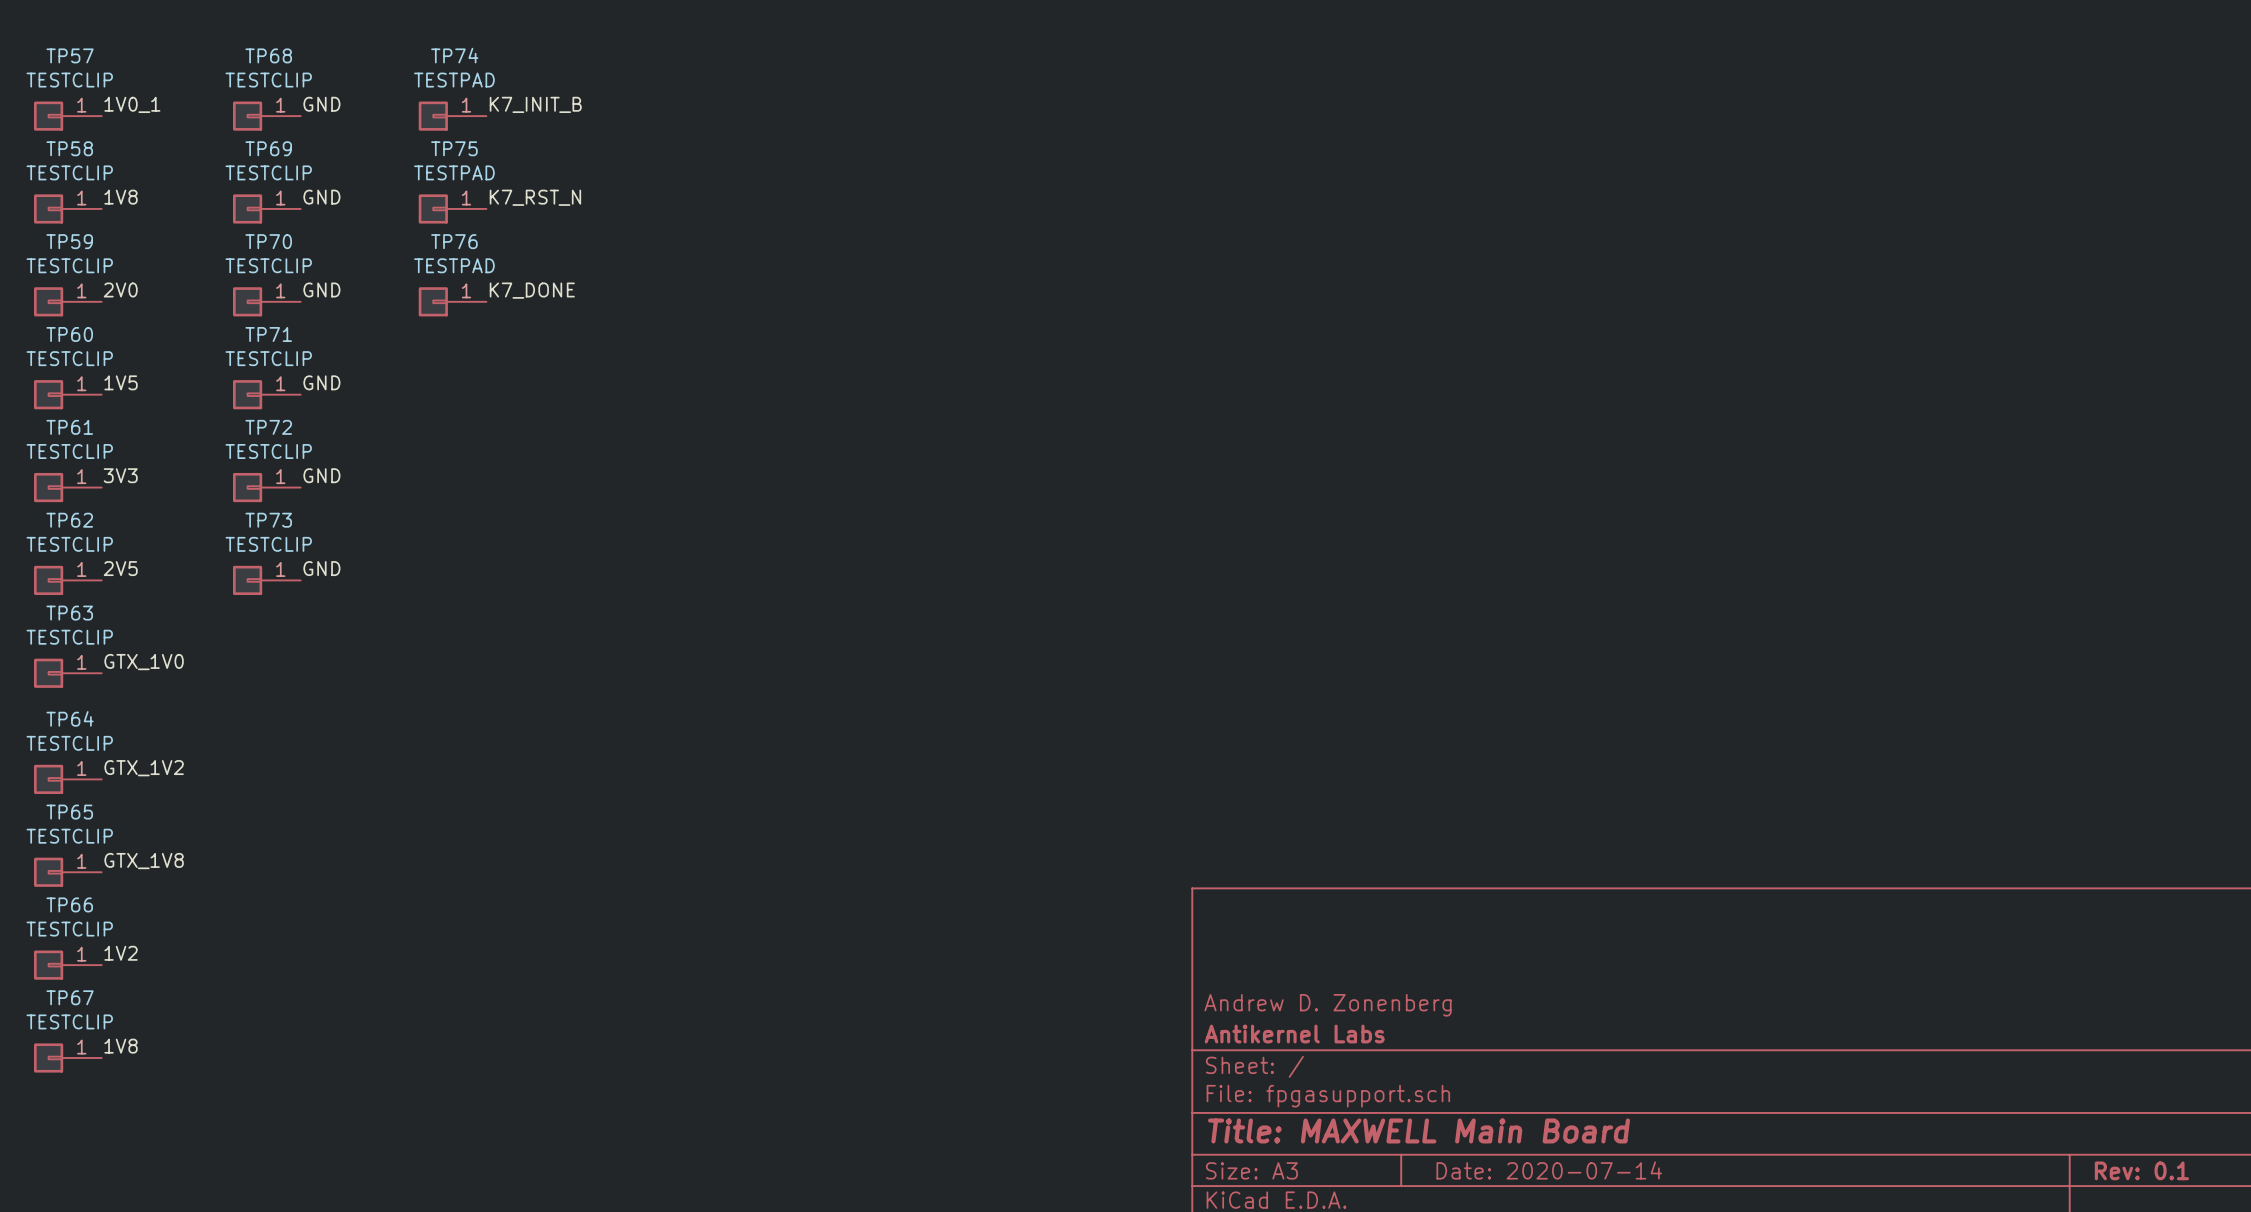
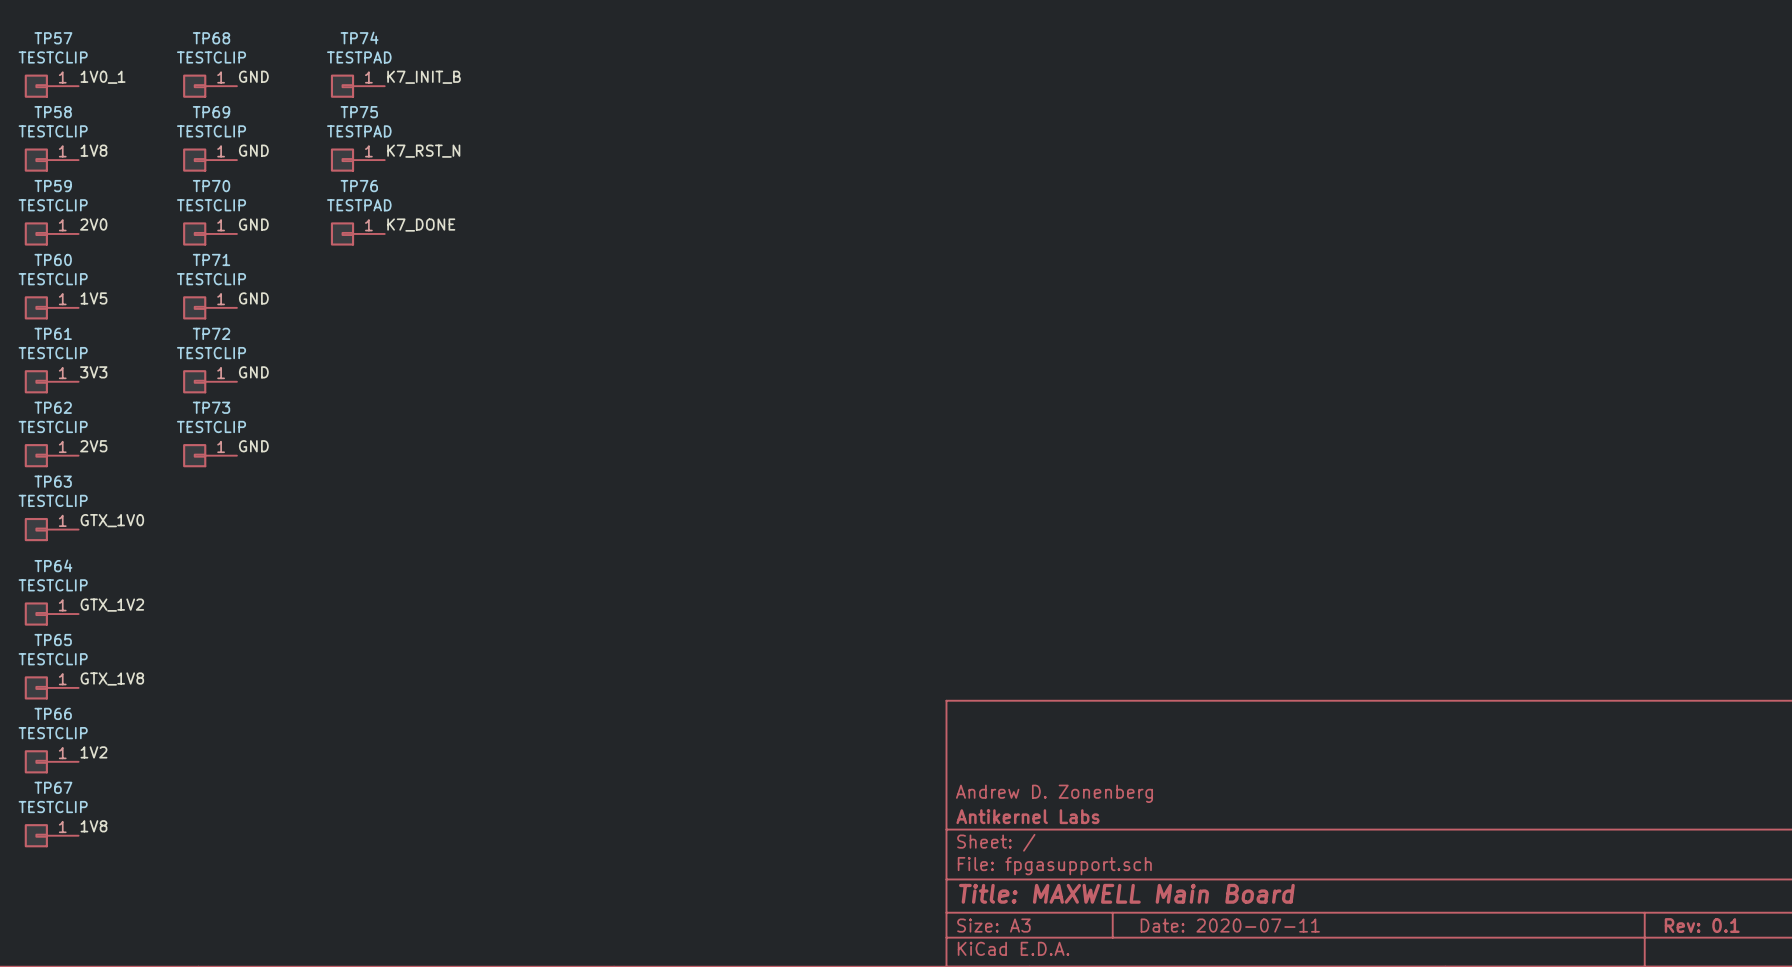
title block: Date: 2020-07-14 (1549, 1170) -> Date: 2020-07-11 (1230, 925)

